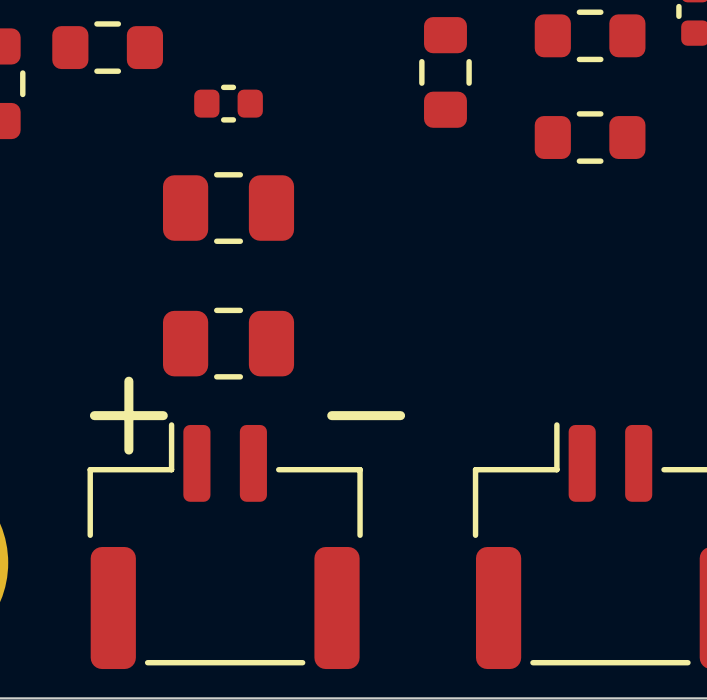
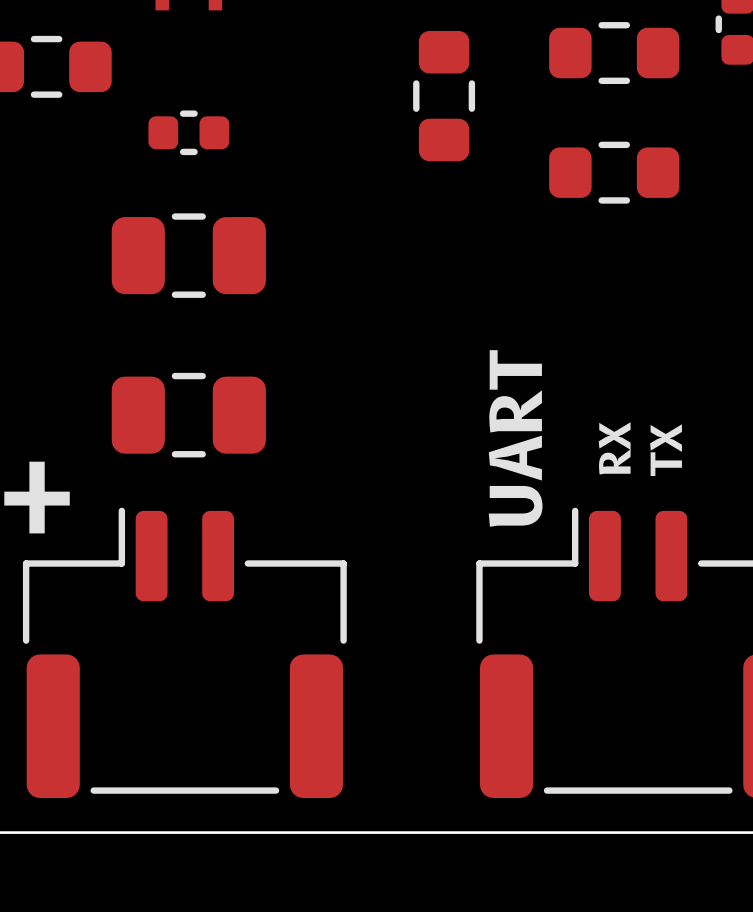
text: none -> UART (515, 438)
text: none -> RX (614, 448)
text: none -> TX (666, 450)
text: - (366, 415) -> none

